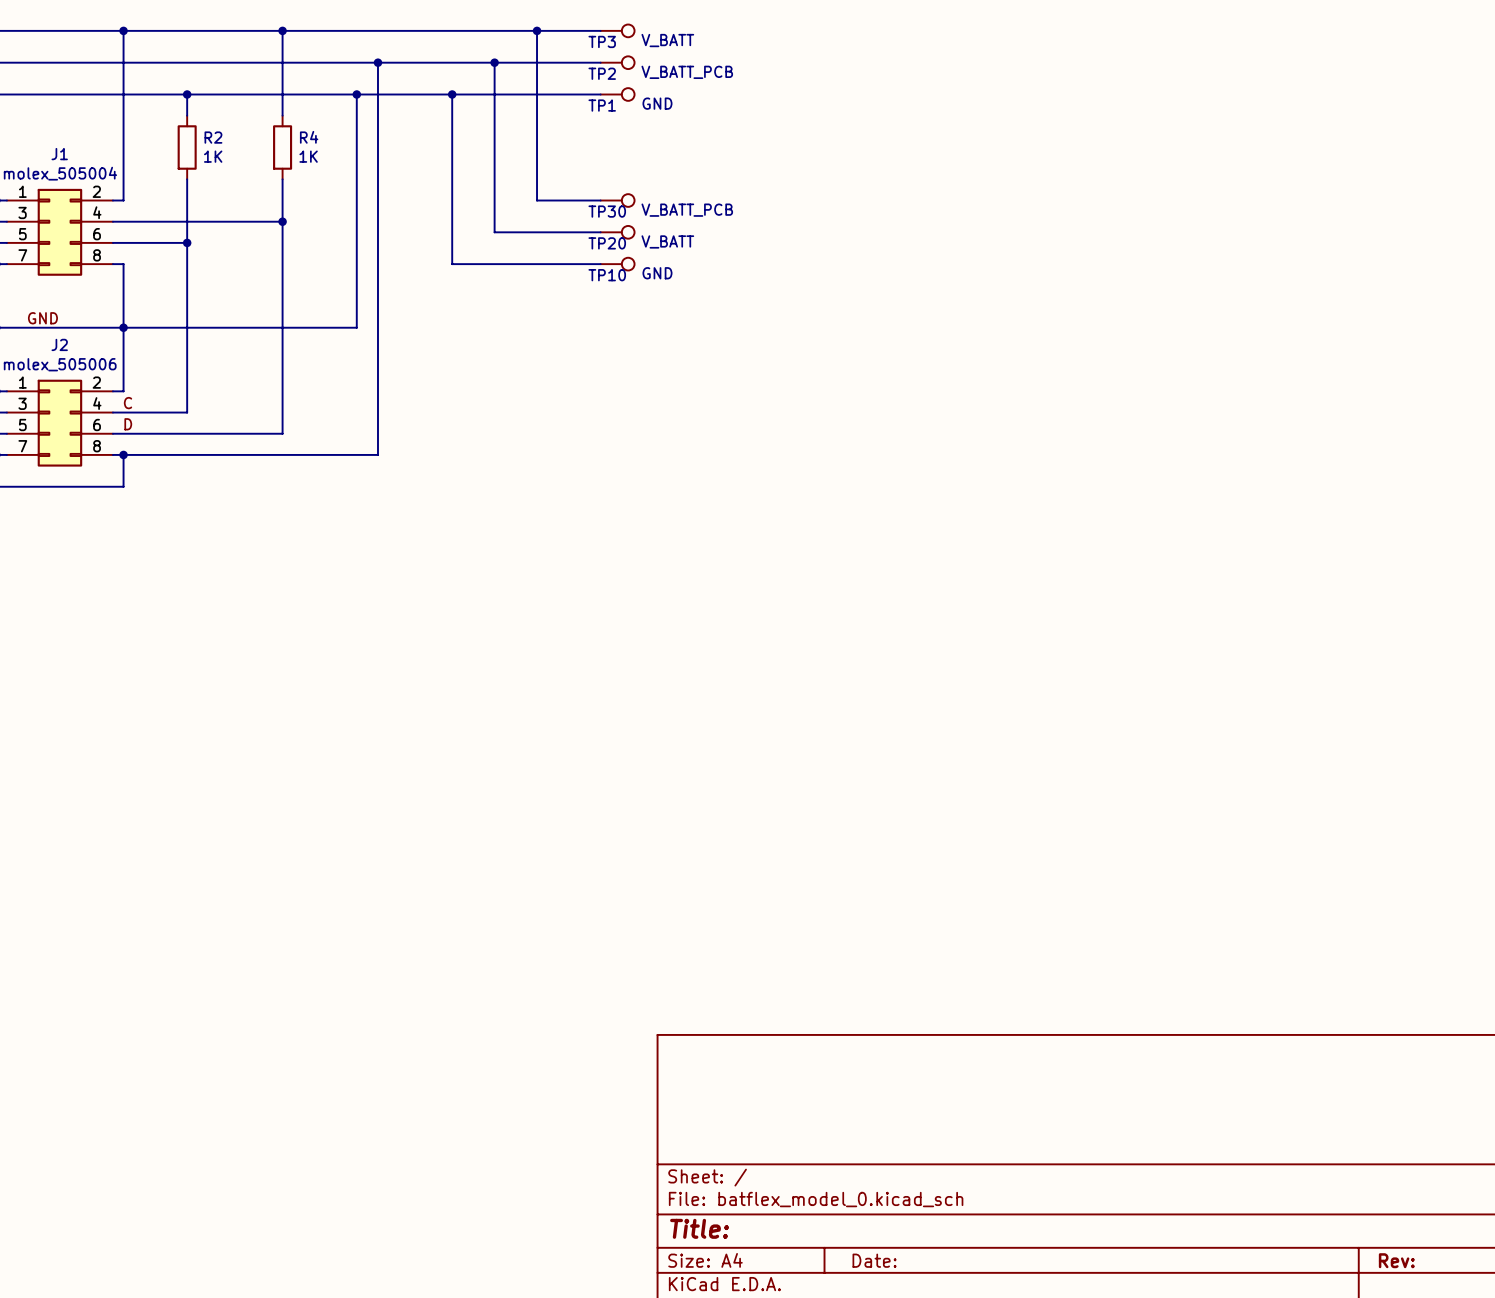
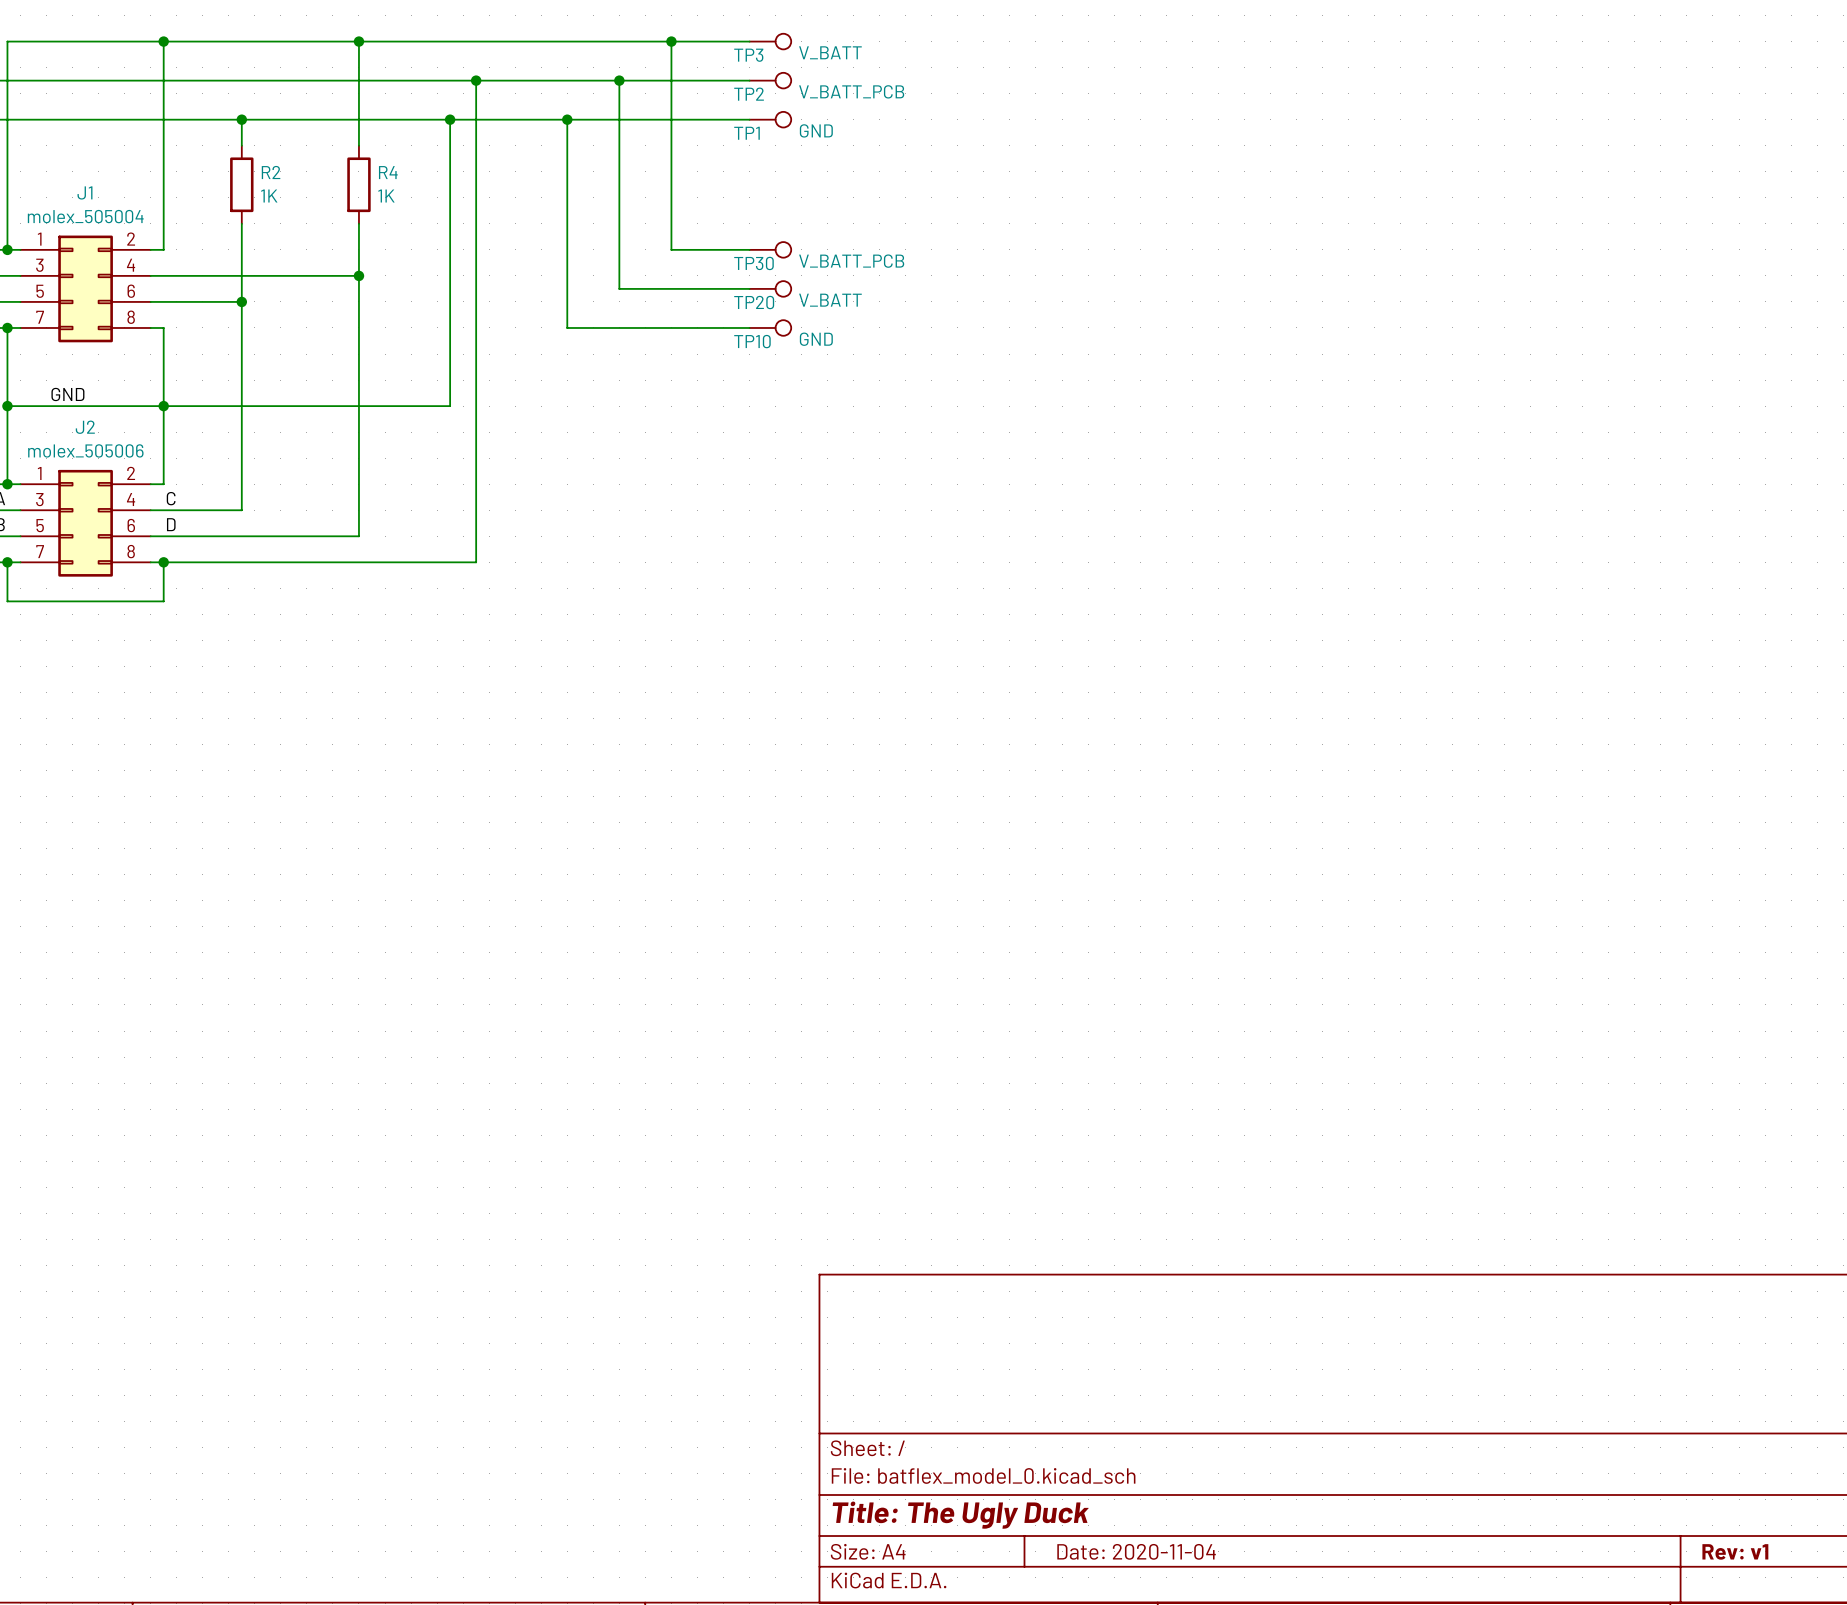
title block: Title: (699, 1228) -> Title: The Ugly Duck (960, 1515)
title block: Date: (874, 1260) -> Date: 2020-11-04 (1136, 1551)
title block: Rev: (1396, 1260) -> Rev: v1 (1735, 1551)

